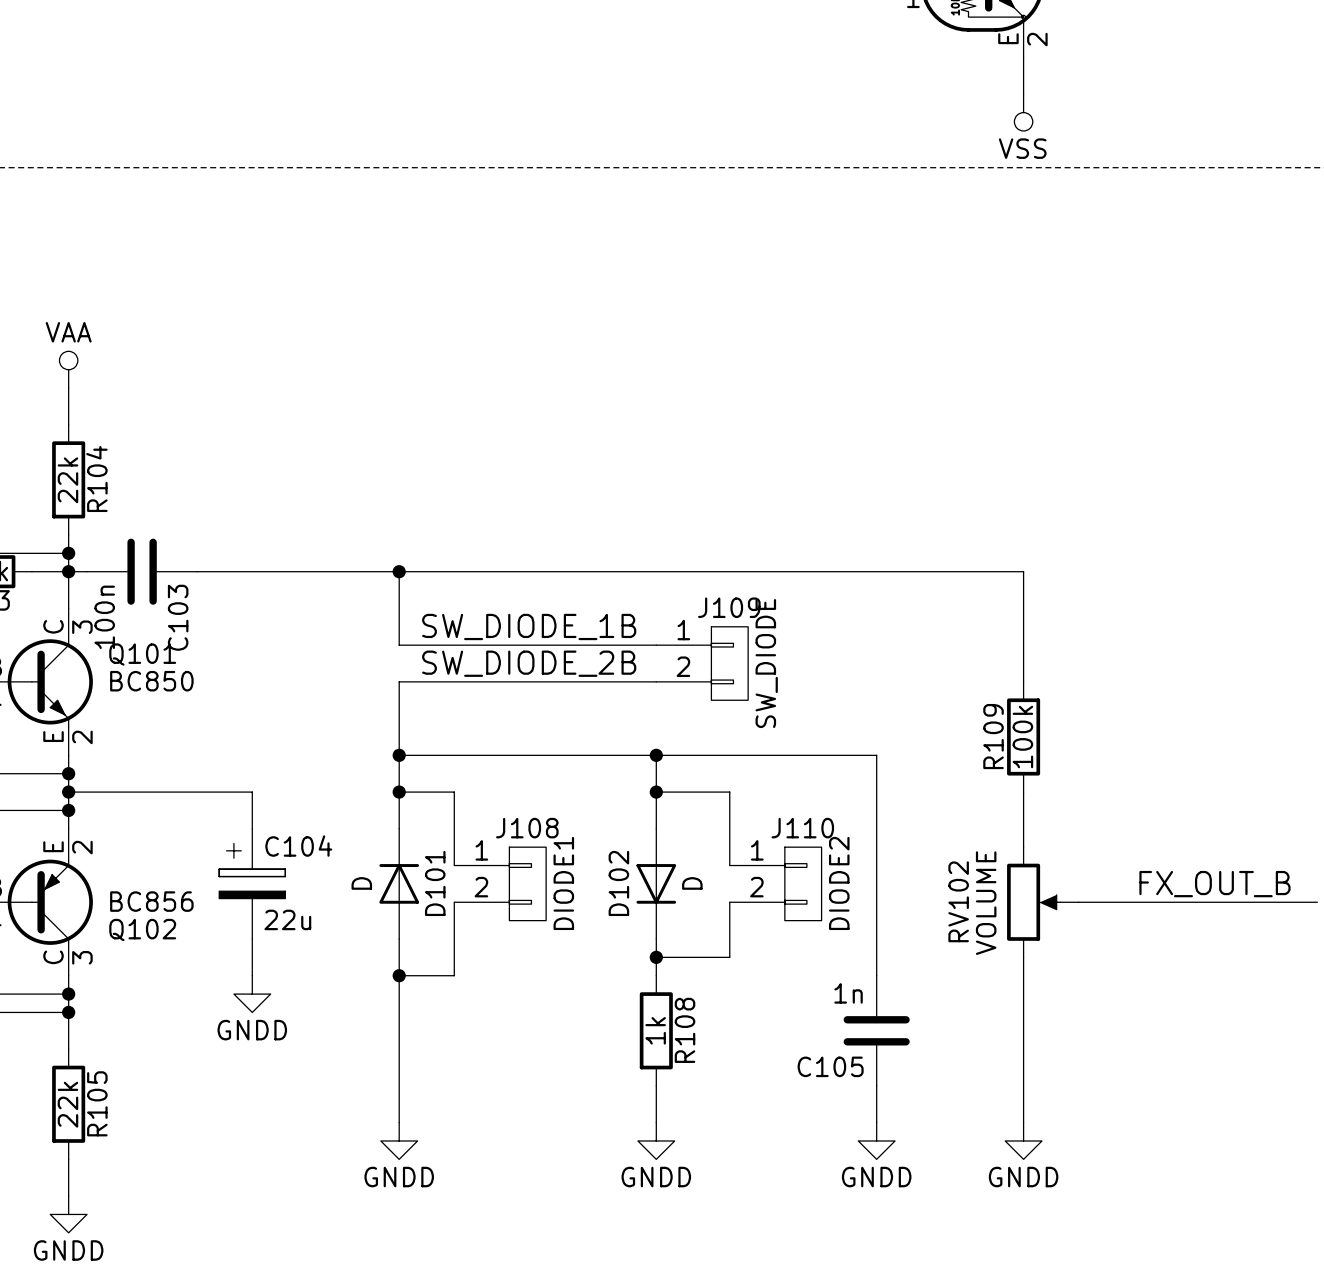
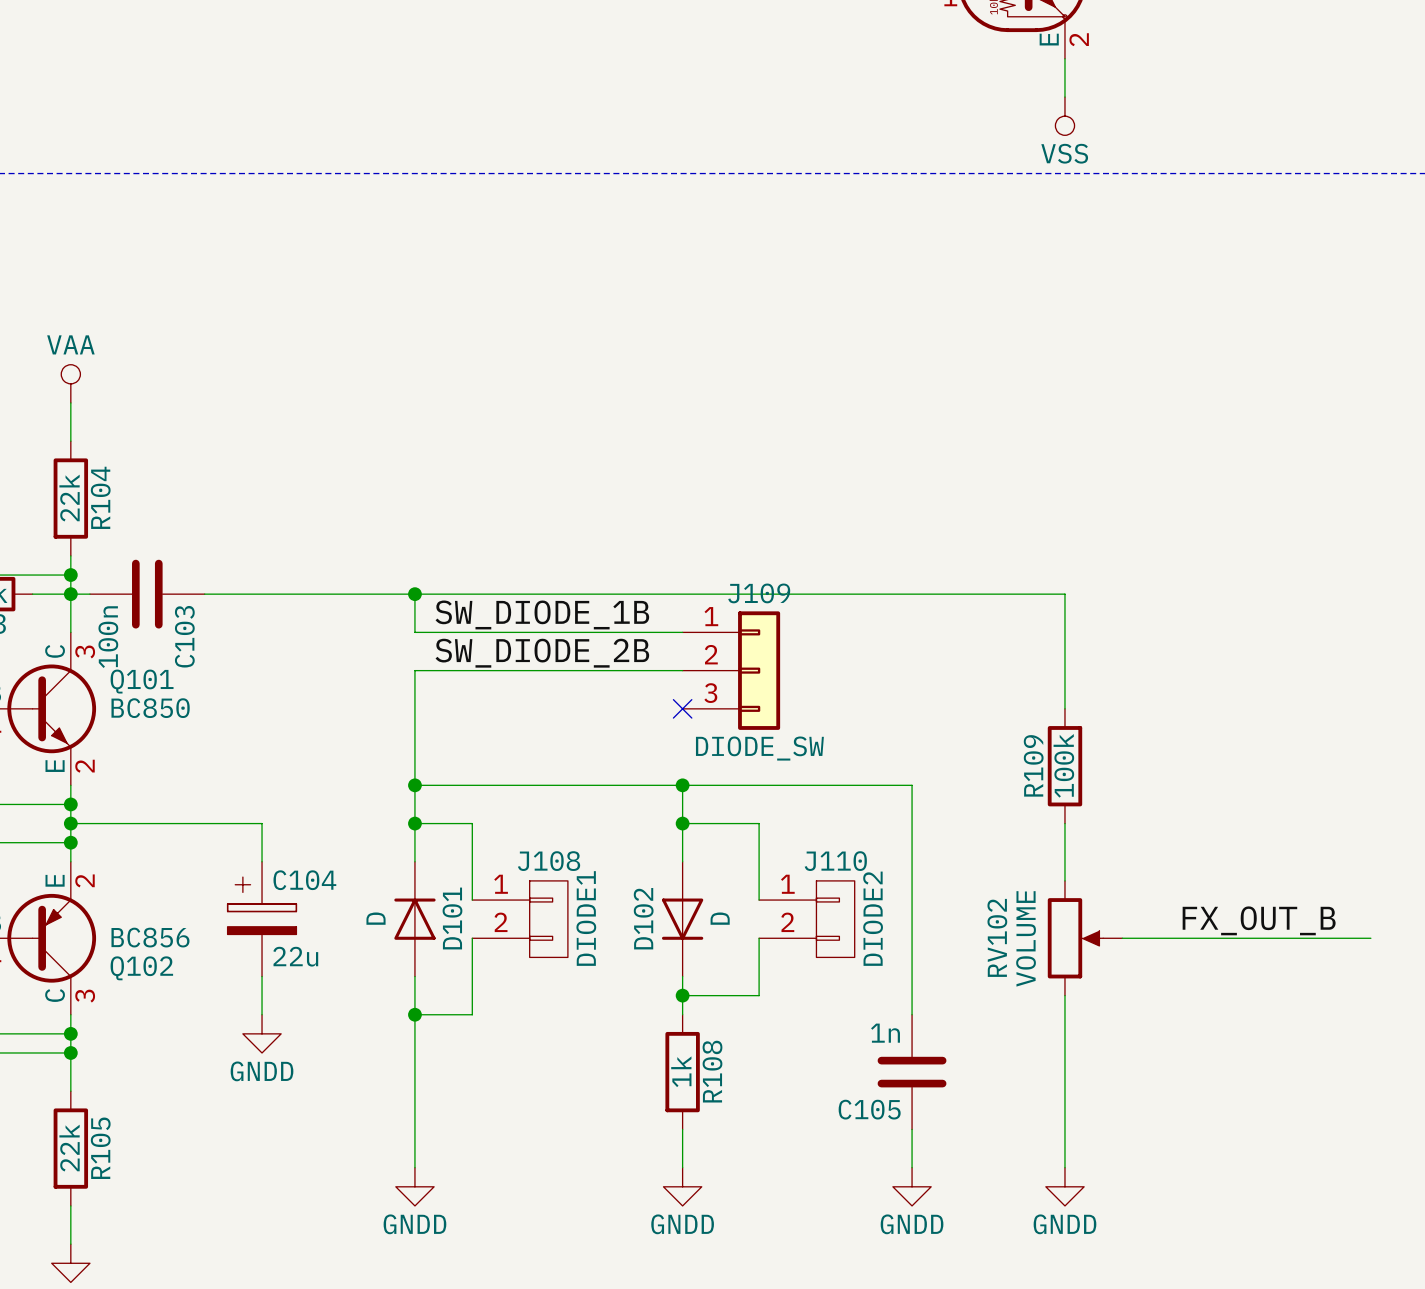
label: none -> SW_DIODE_1B (542, 614)
wire: (399, 608) (399, 645) -> (414, 708) (414, 670)
label: SW_DIODE_1B (529, 626) -> SW_DIODE_2B (542, 653)
J109 symbol: [656, 626, 749, 701] -> [682, 611, 781, 730]
label: SW_DIODE_2B (529, 663) -> none
J109 value: SW_DIODE (766, 663) -> DIODE_SW (759, 748)
wire: (399, 681) (656, 681) -> (414, 632) (682, 632)
no-connect mark: none -> (682, 708)

